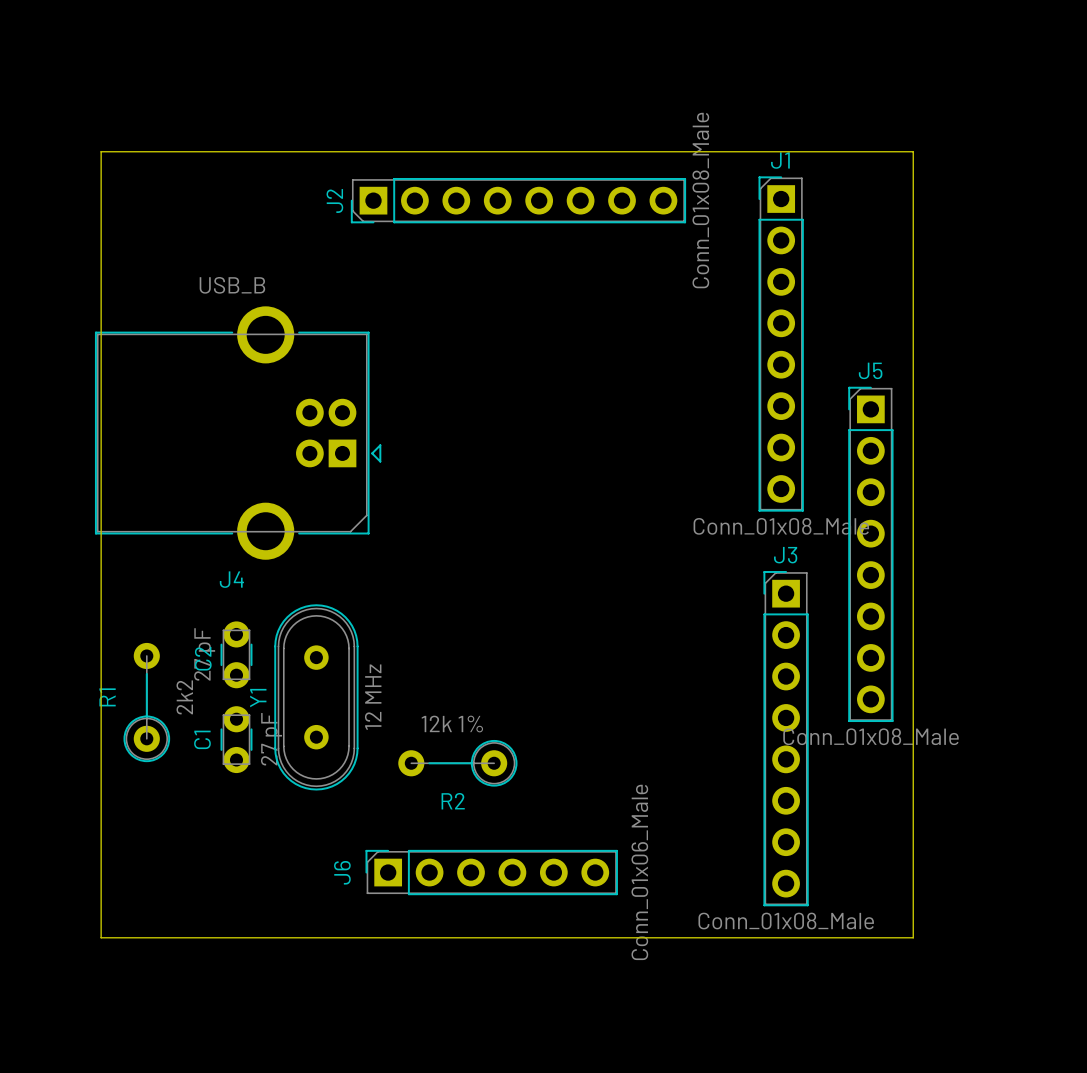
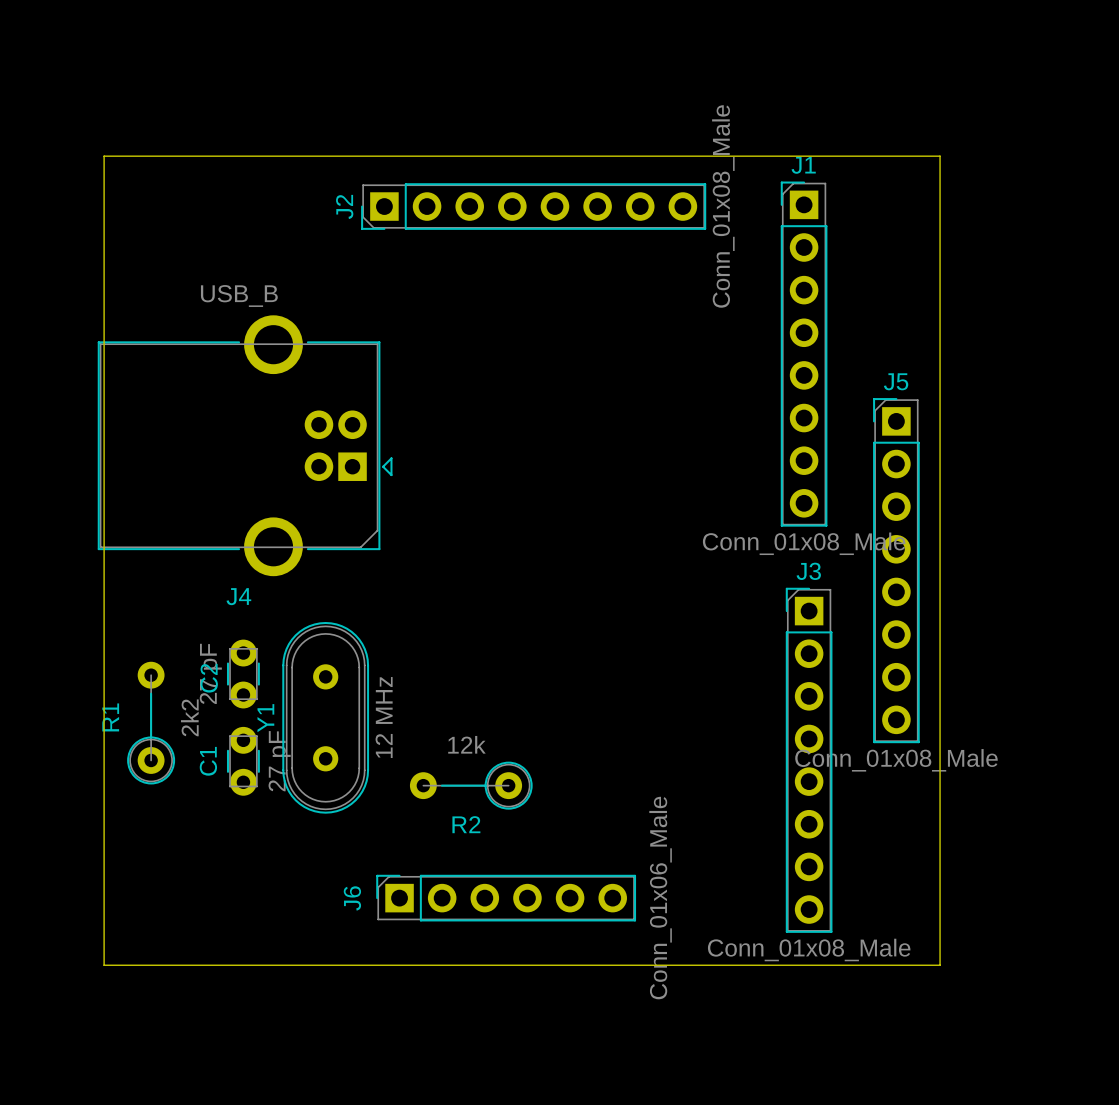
R2 value: 12k 1% (452, 724) -> 12k (466, 744)

